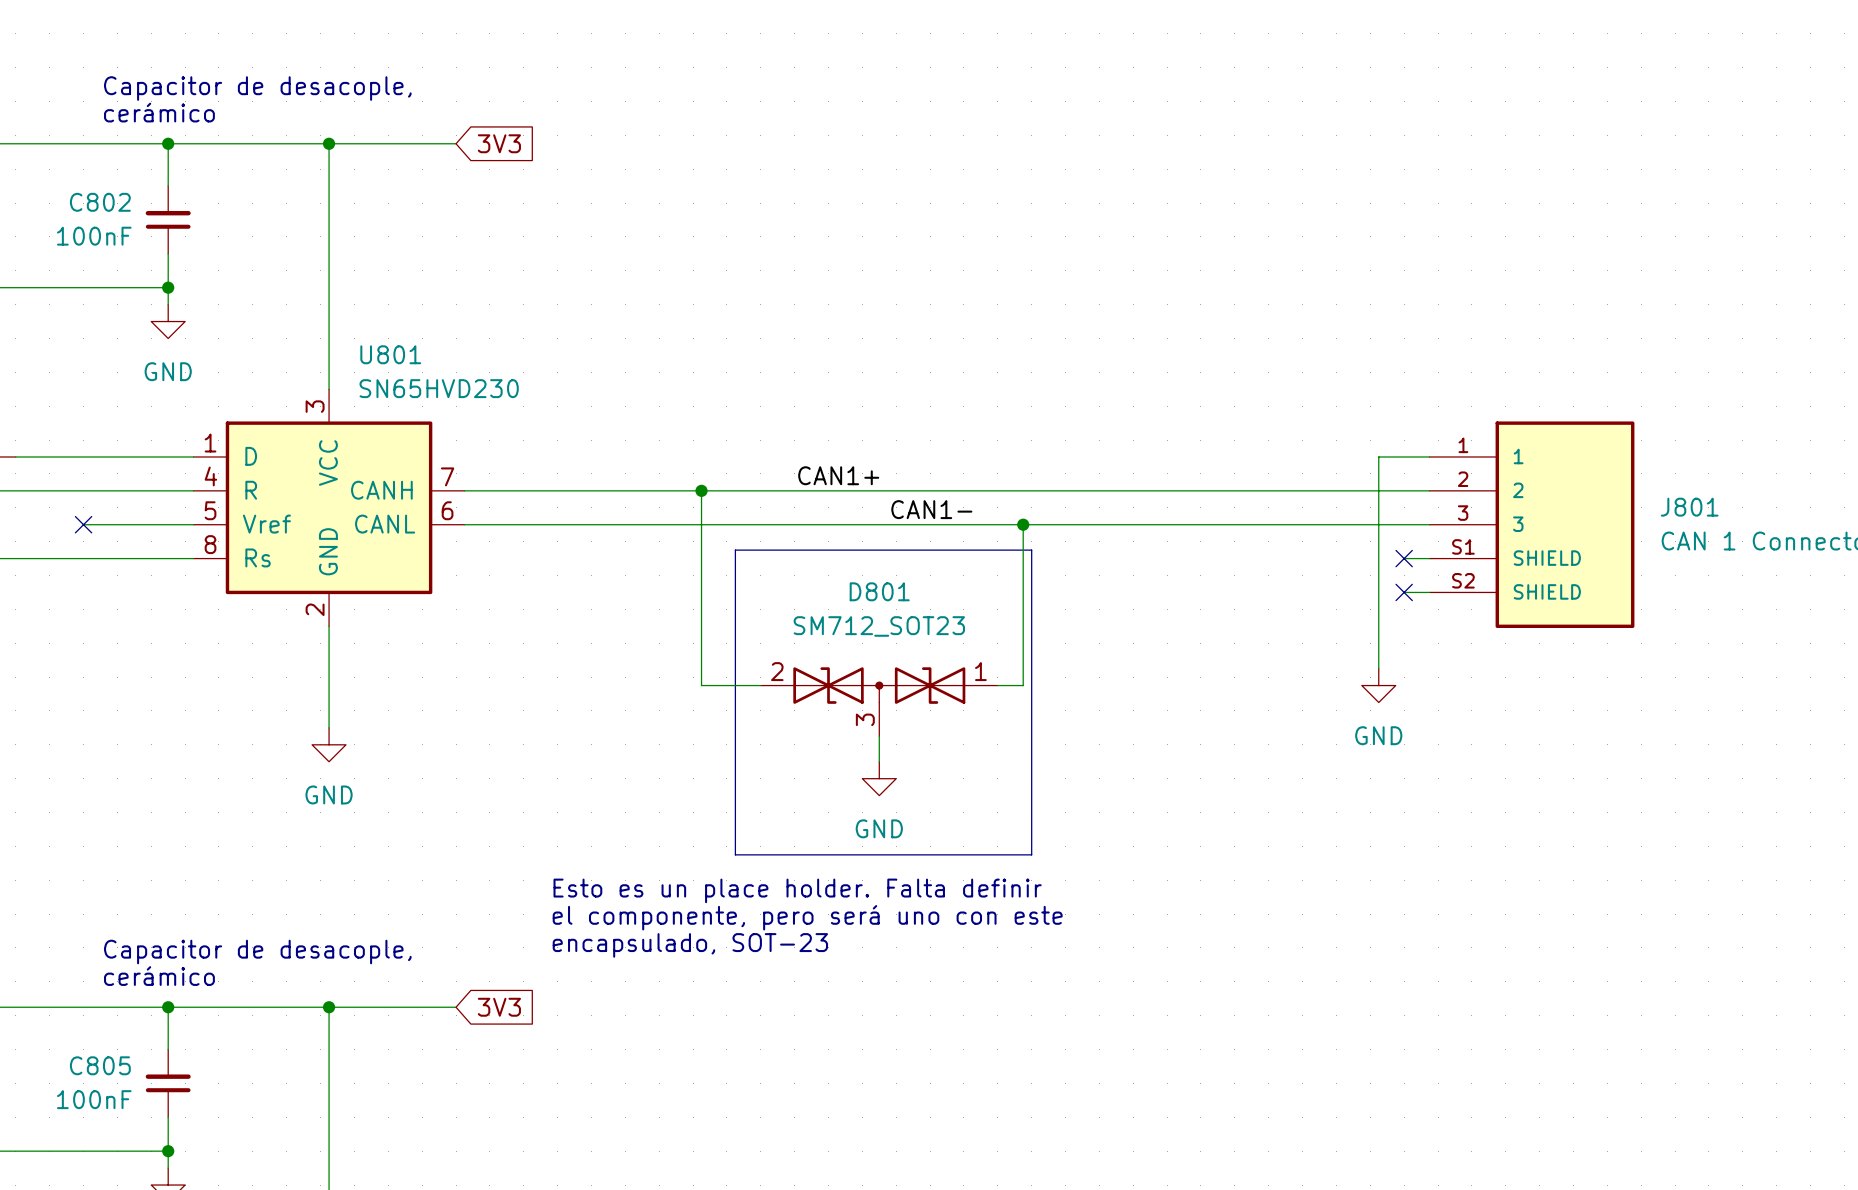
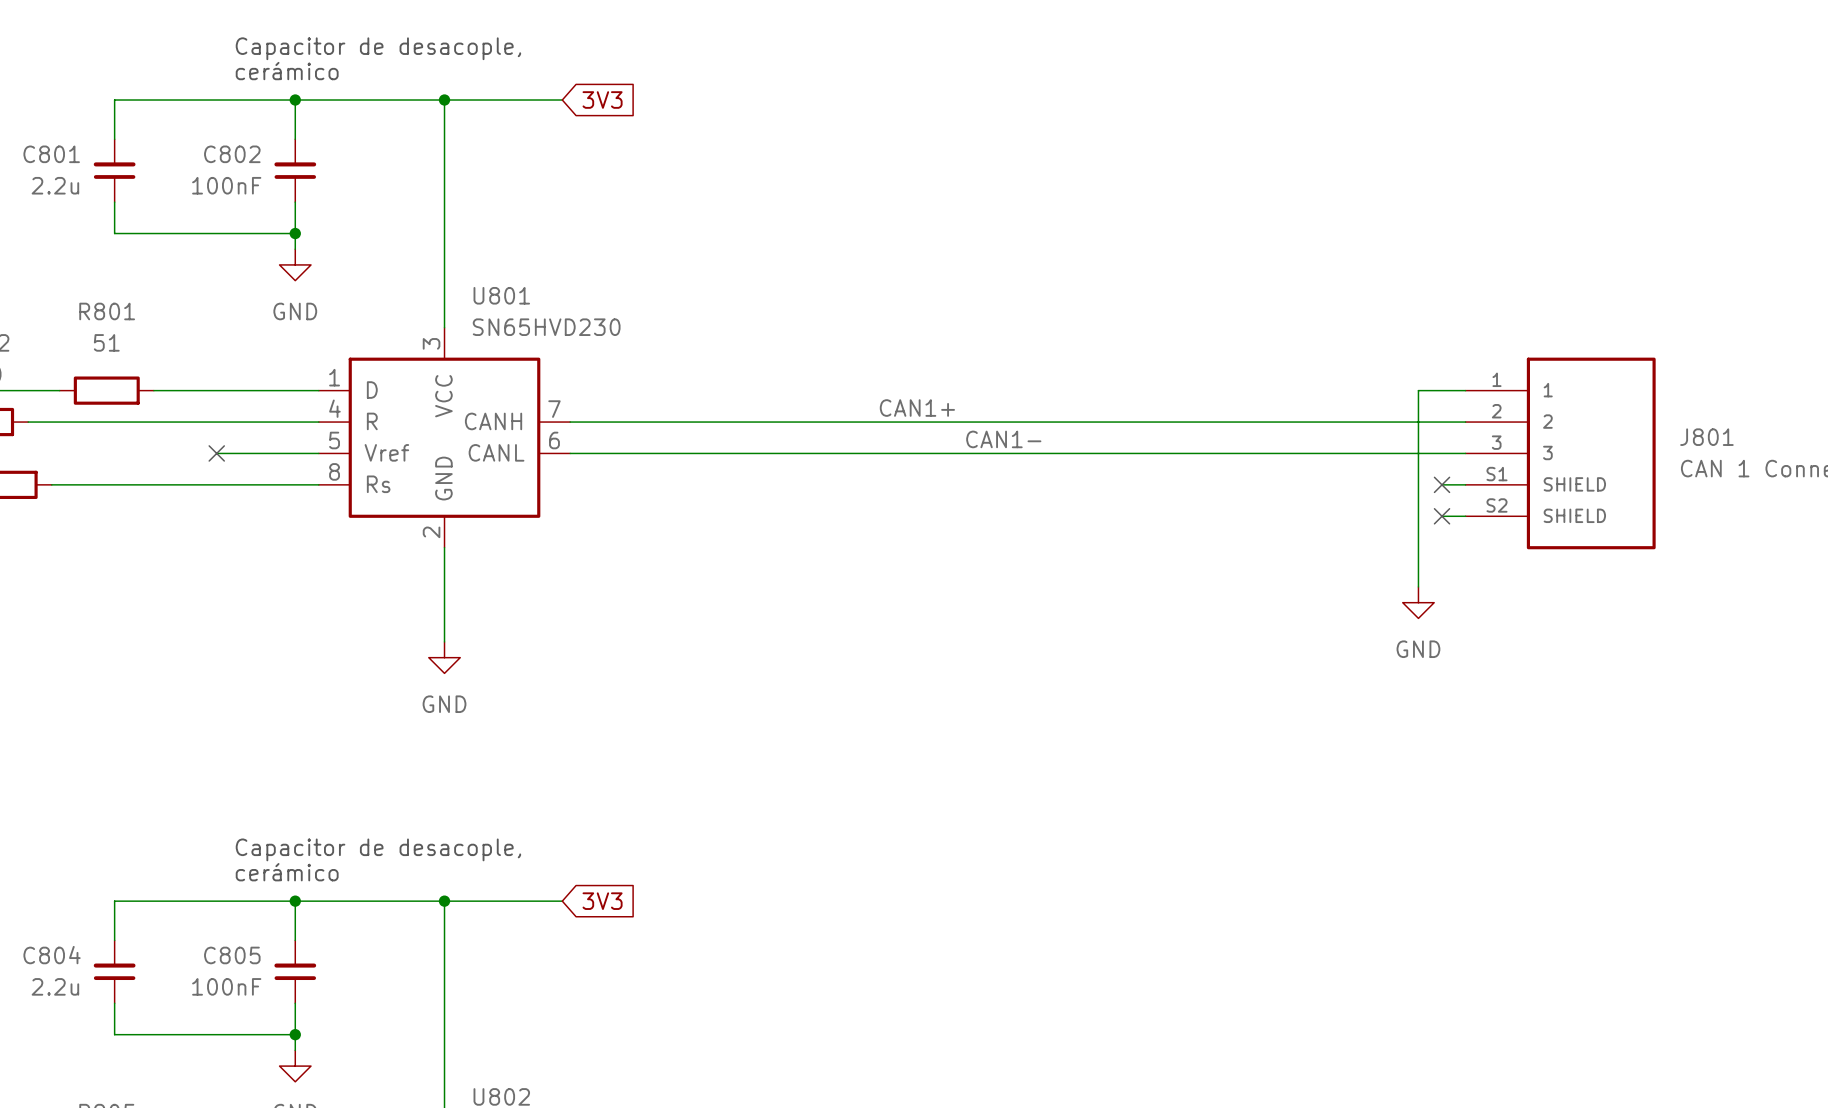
wire: (701, 490) (701, 685) (760, 685) -> none
junction: (701, 490) -> none
wire: (1023, 524) (1023, 685) (997, 685) -> none
junction: (1023, 524) -> none
line: (735, 550) (1031, 550) (1031, 854) (735, 854) (735, 550) -> none
D801: SM712_SOT23 (879, 701) -> none
wire: (879, 736) (879, 761) -> none
power symbol: GND (879, 778) -> none
text: Esto es un place holder. Falta definir (797, 890) -> none
text: el componente, pero será uno con este (807, 917) -> none
text: encapsulado, SOT-23 (690, 945) -> none

